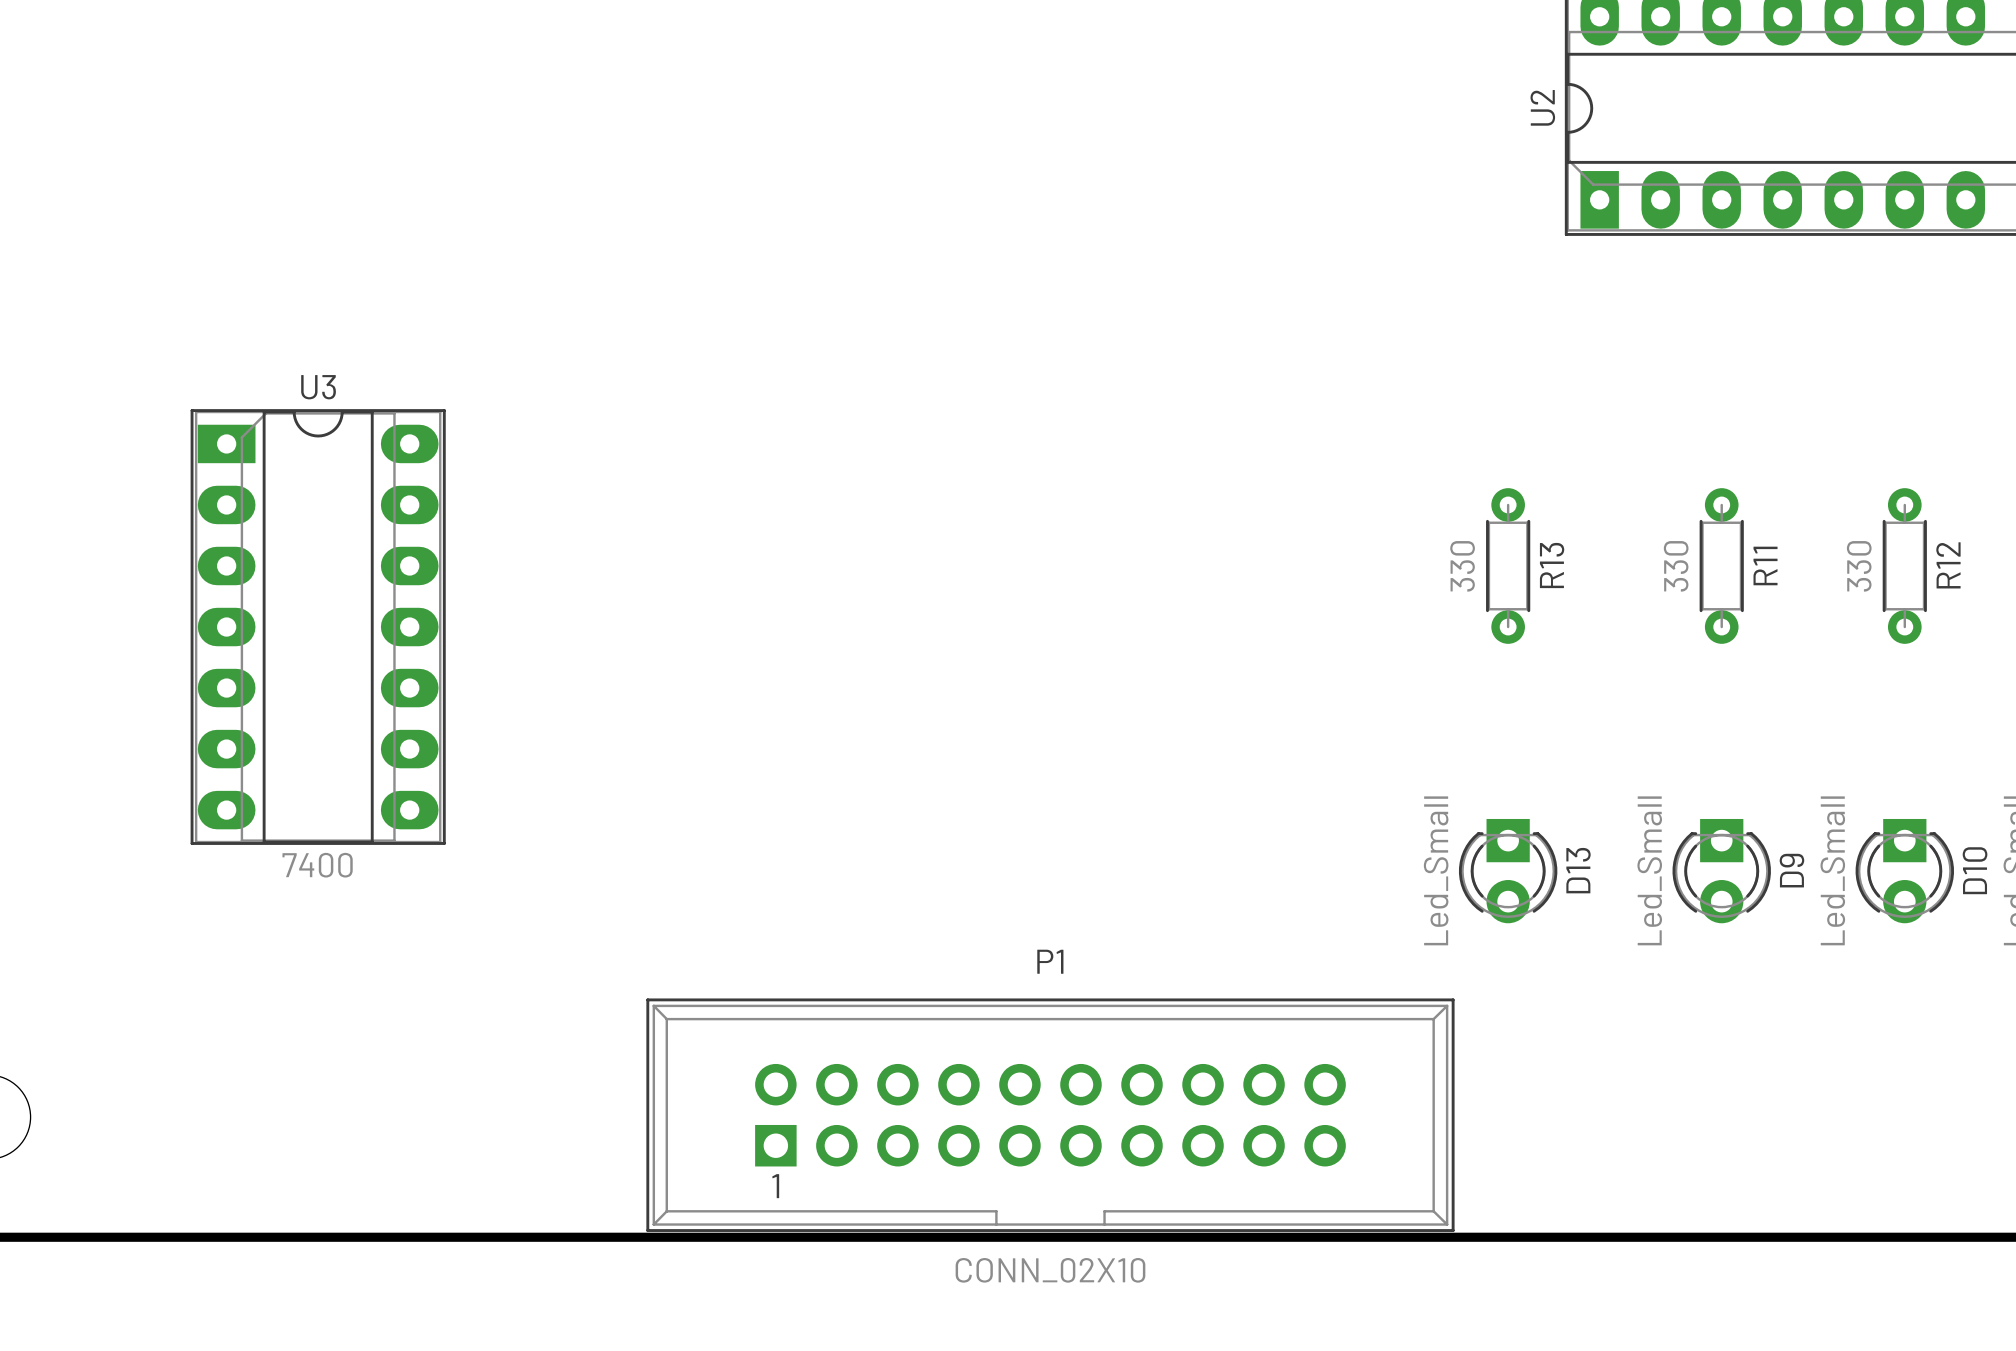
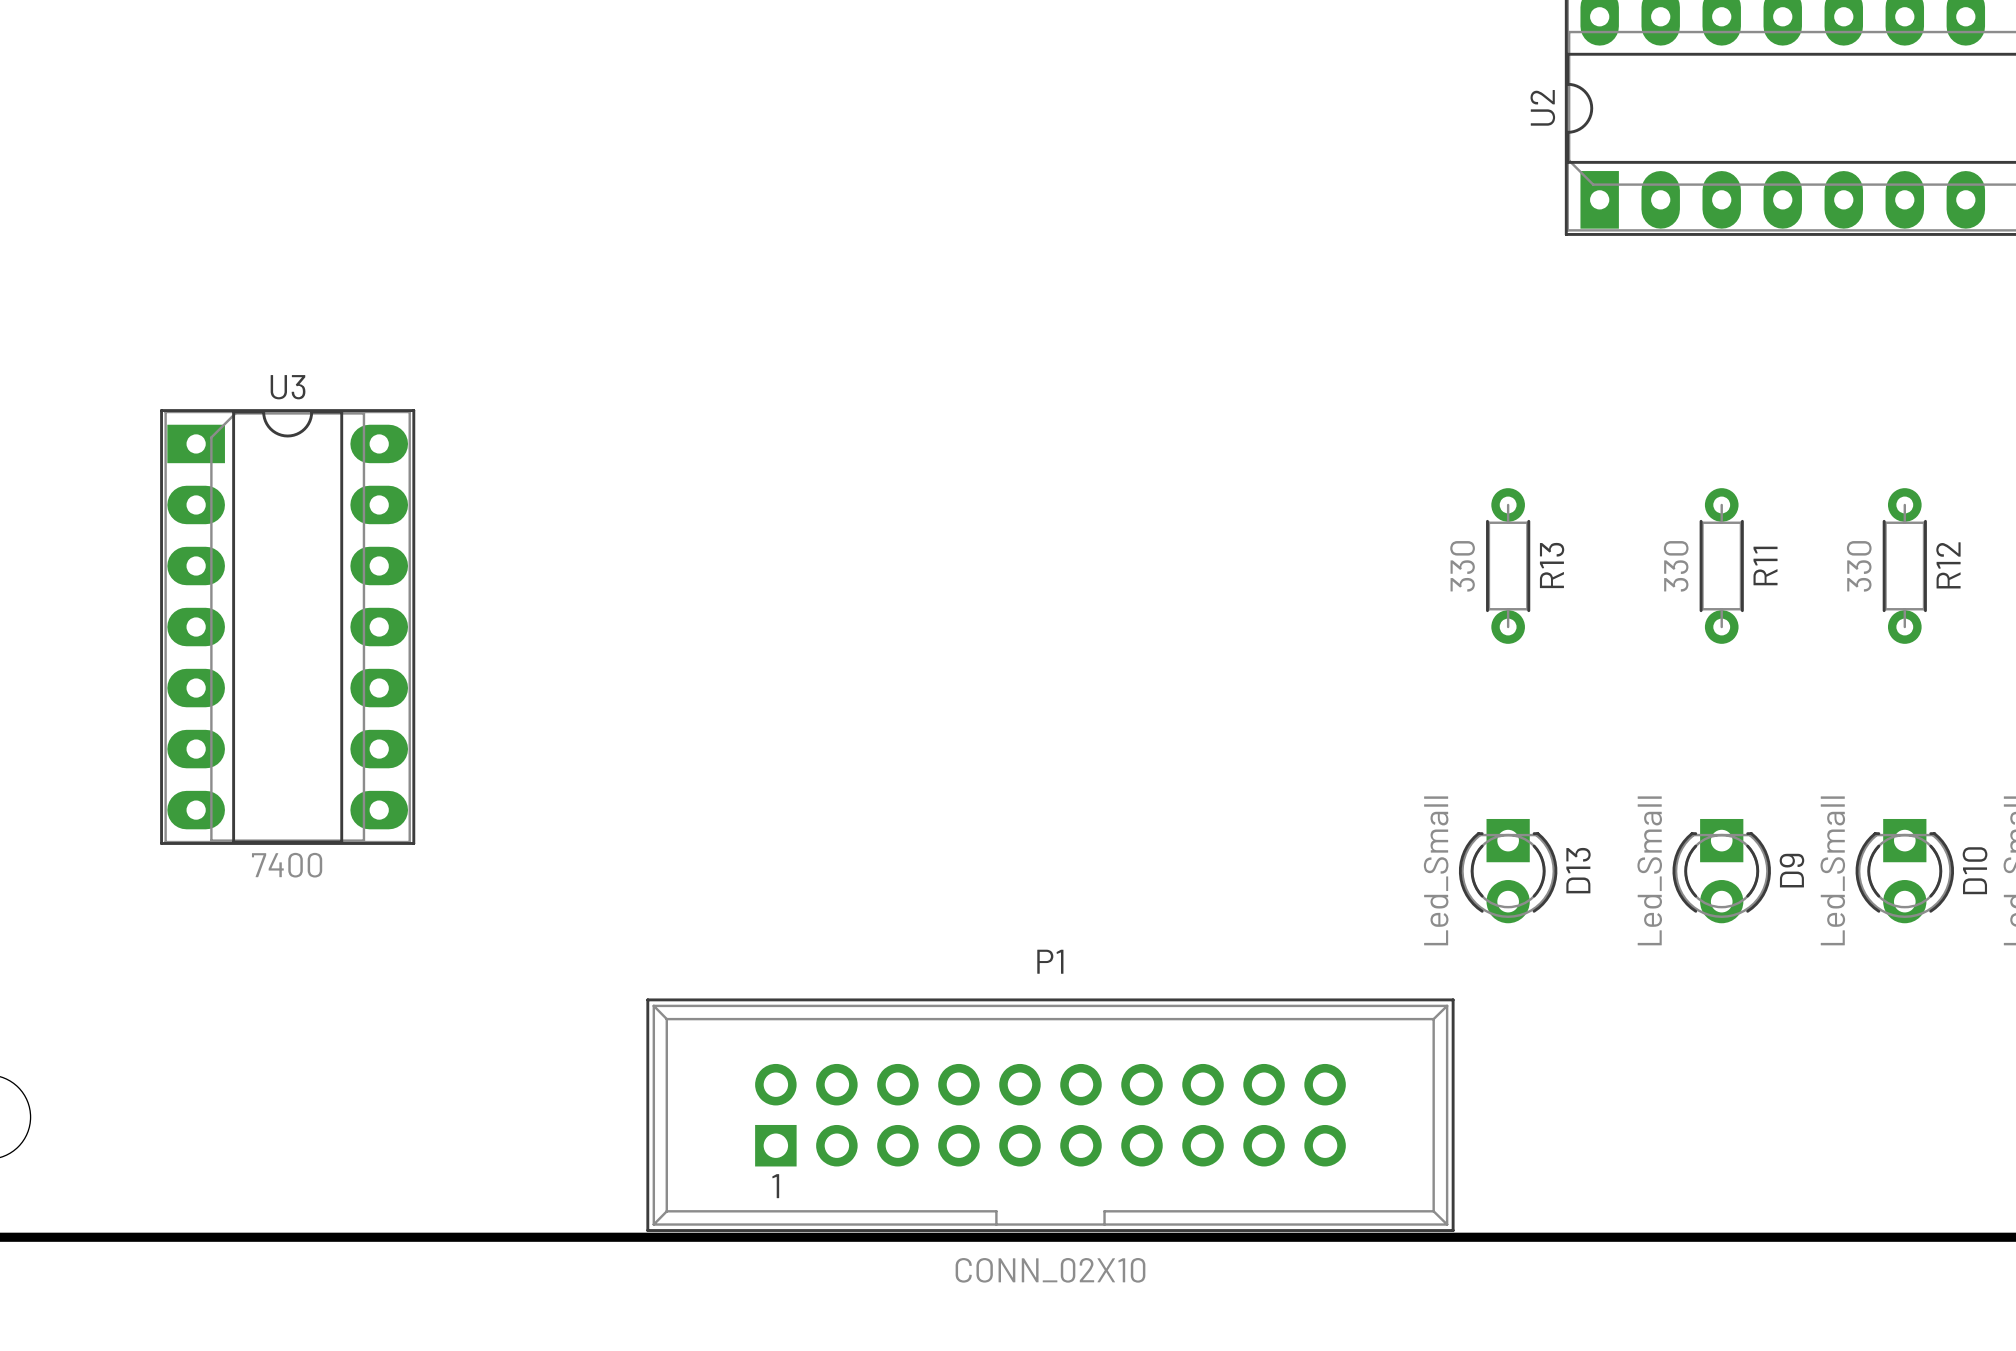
U3 position: (318, 627) -> (287, 627)

